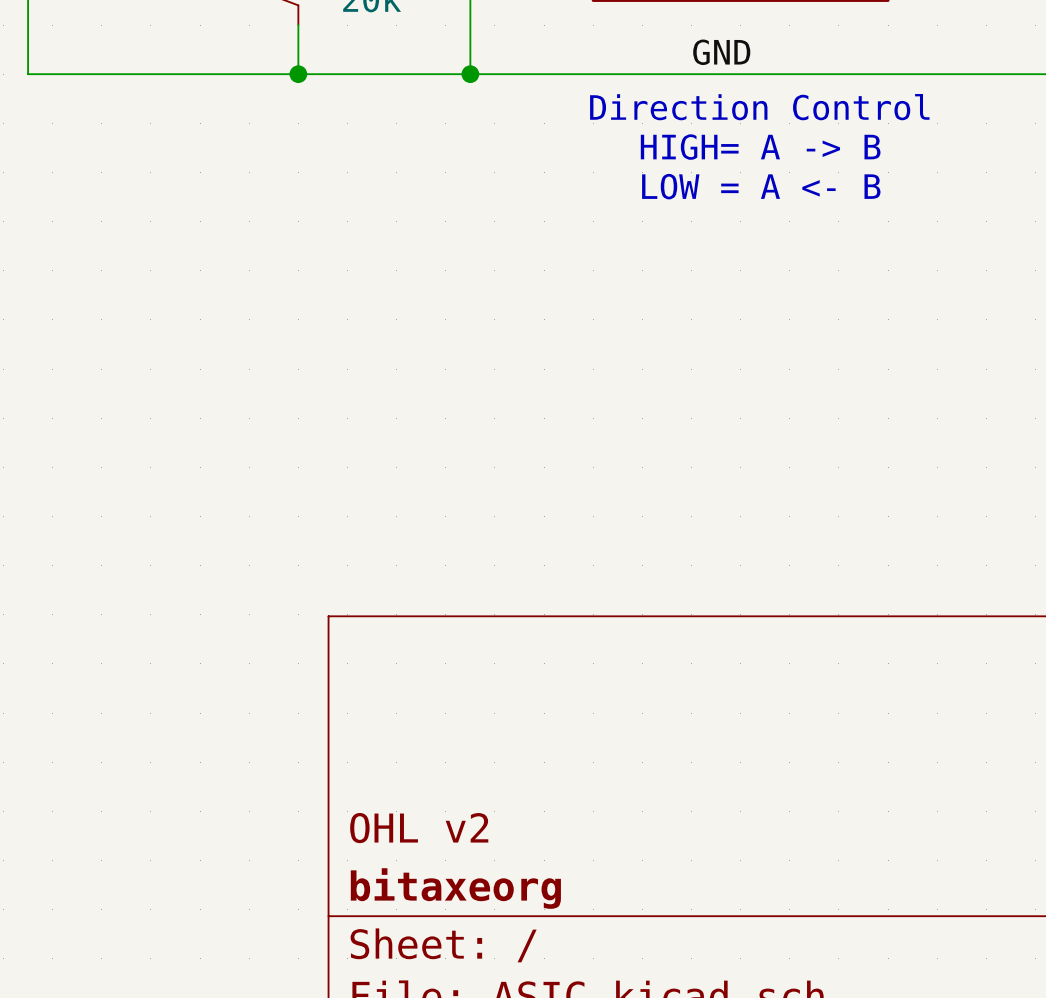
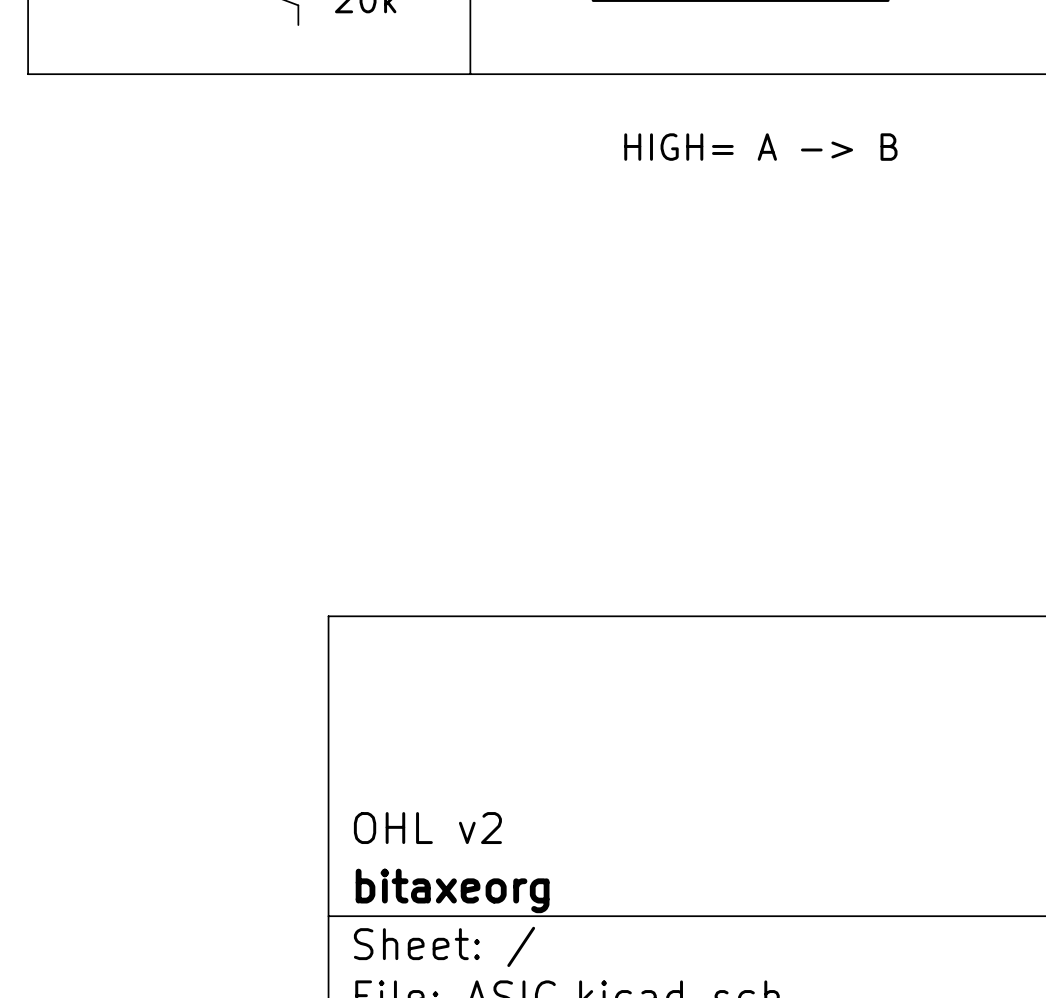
wire: (298, 25) (298, 74) -> none
label: GND (721, 52) -> none
junction: (298, 74) -> none
junction: (470, 74) -> none
text: Direction Control (759, 107) -> none
text: LOW = A <- B (761, 186) -> none

